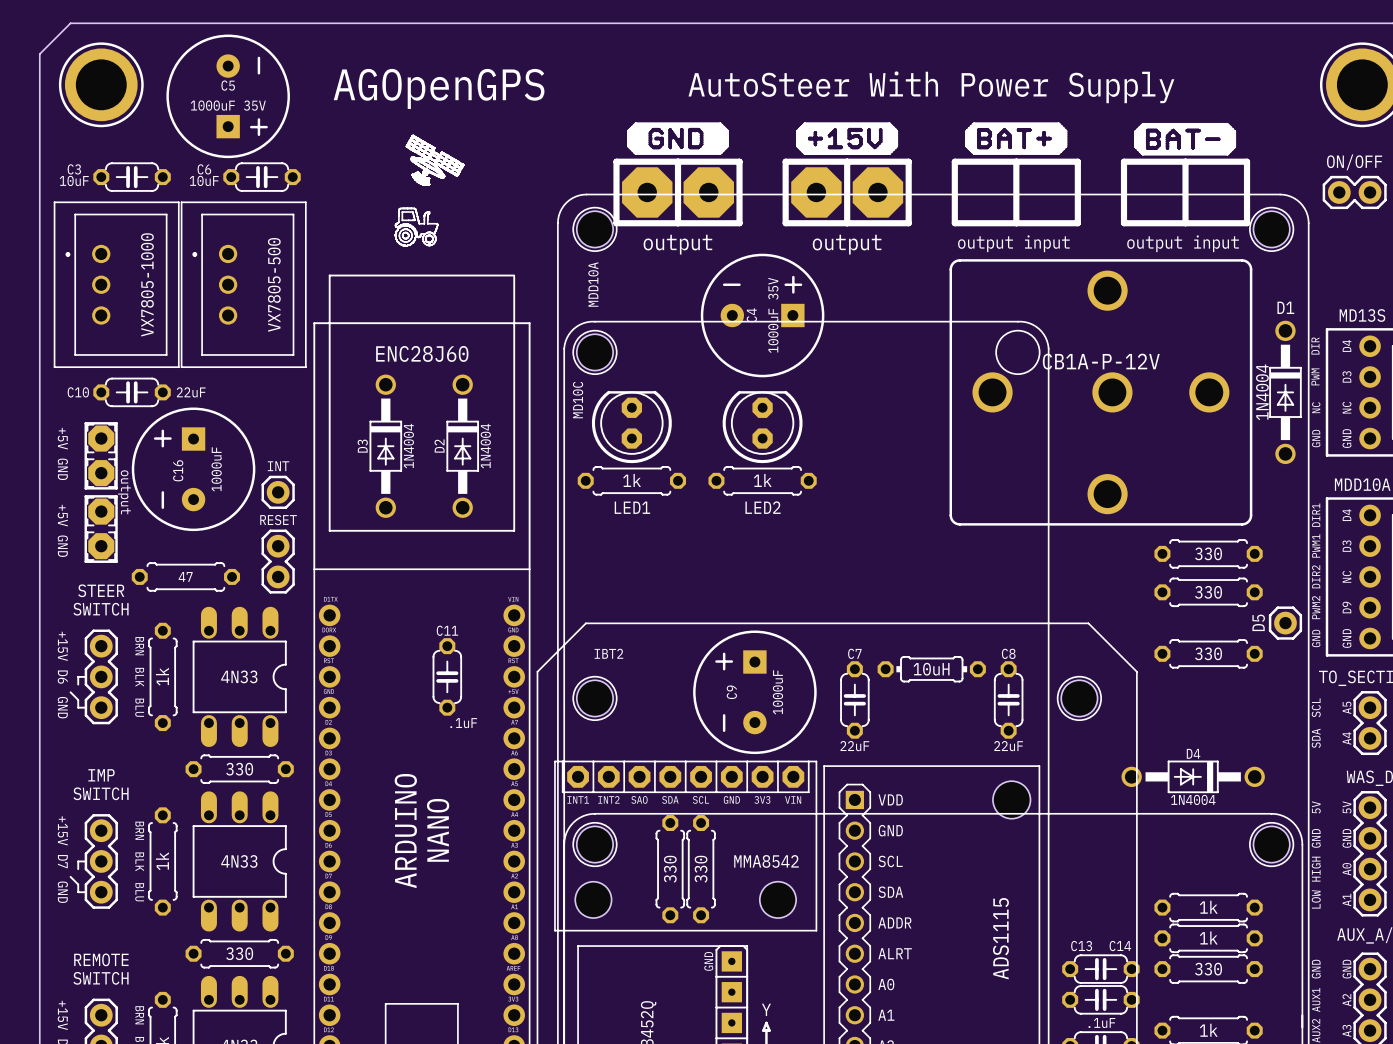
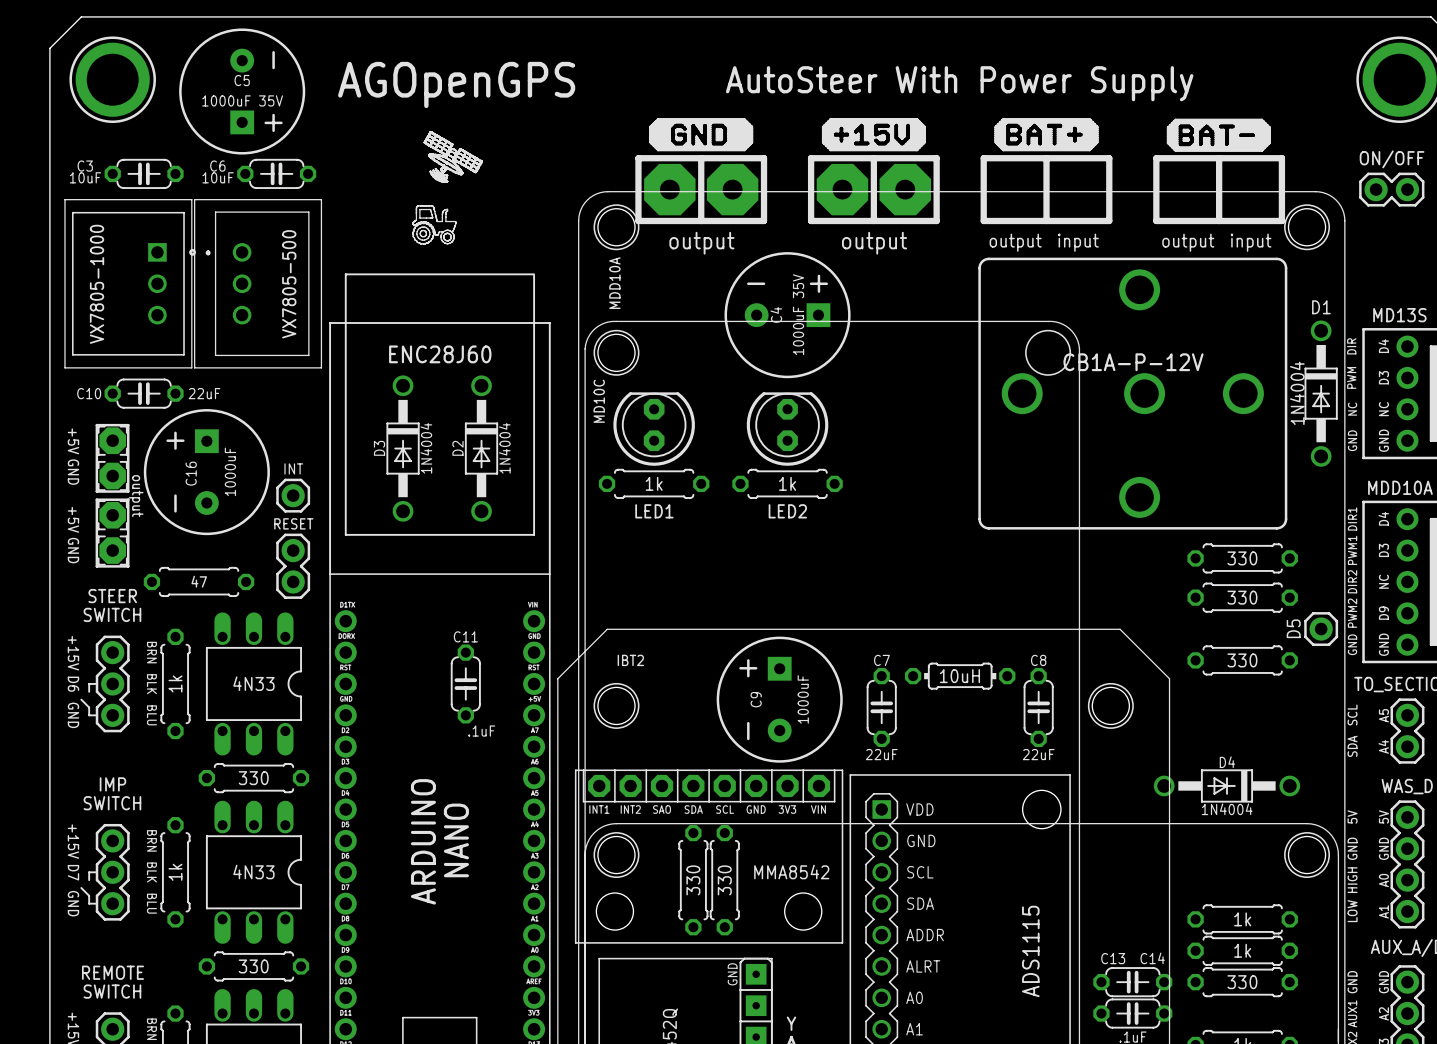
part footprint: [65, 213, 168, 356] -> [72, 211, 196, 356]
text: none -> VX7805-1000 (97, 284)
part value: VX7805-1000 (147, 284) -> none

